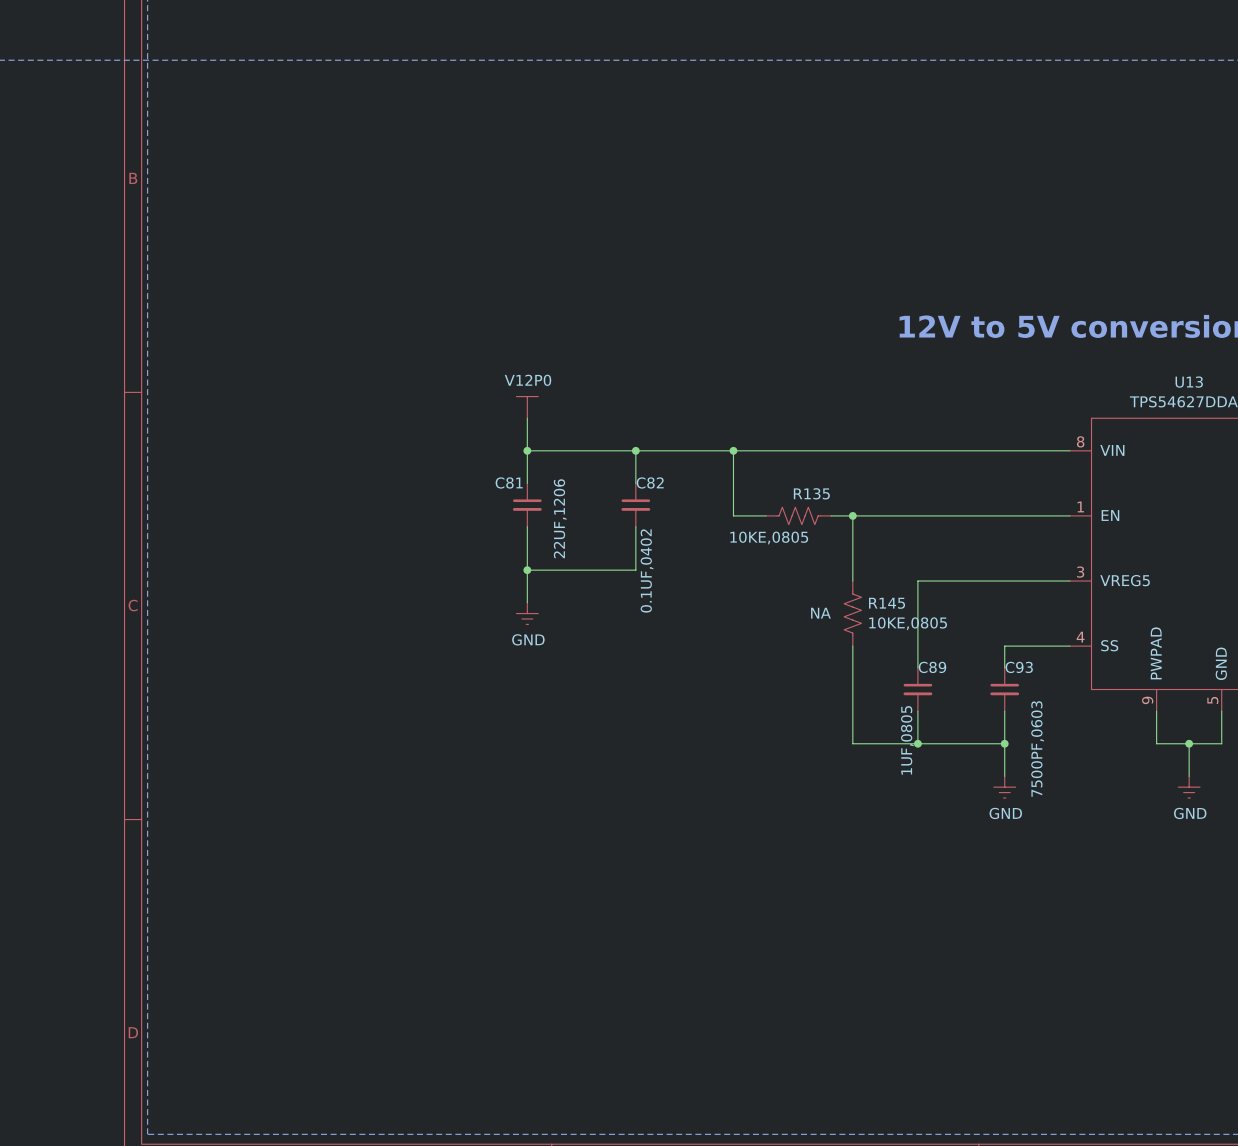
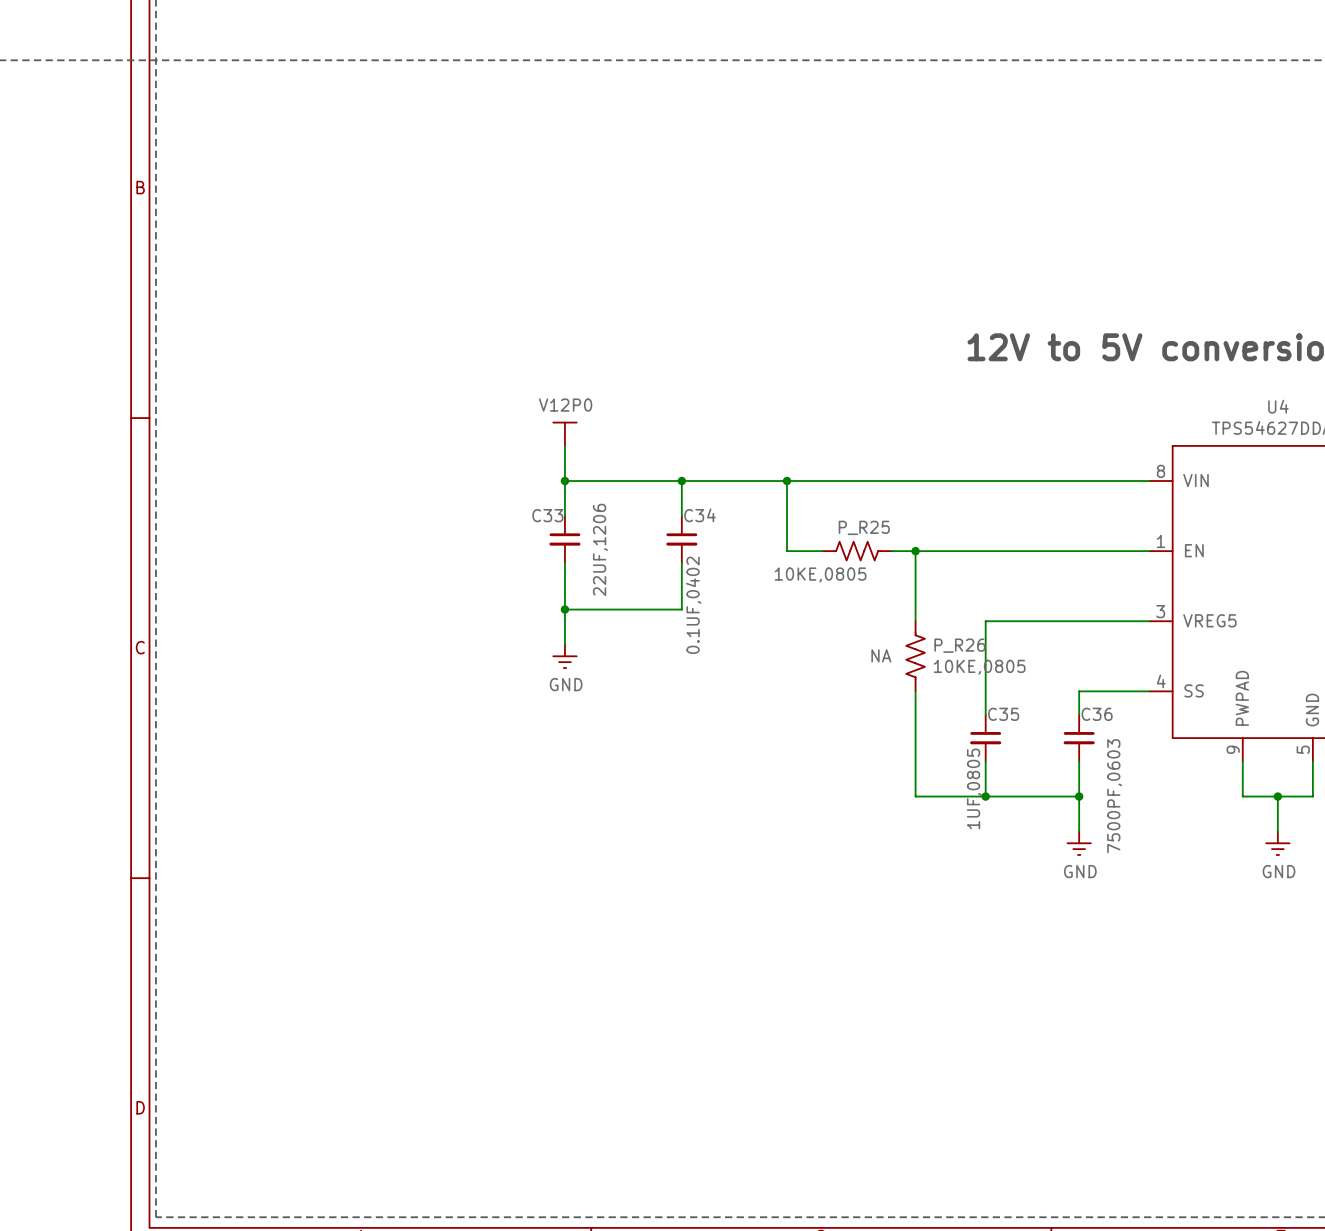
U13 name: U13 (1189, 382) -> U4 (1278, 406)
C81 name: C81 (509, 482) -> C33 (547, 515)
C82 name: C82 (650, 482) -> C34 (700, 515)
R135 name: R135 (811, 493) -> P_R25 (864, 527)
R145 name: R145 (887, 603) -> P_R26 (959, 645)
C89 name: C89 (932, 667) -> C35 (1003, 714)
C93 name: C93 (1019, 667) -> C36 (1097, 714)

